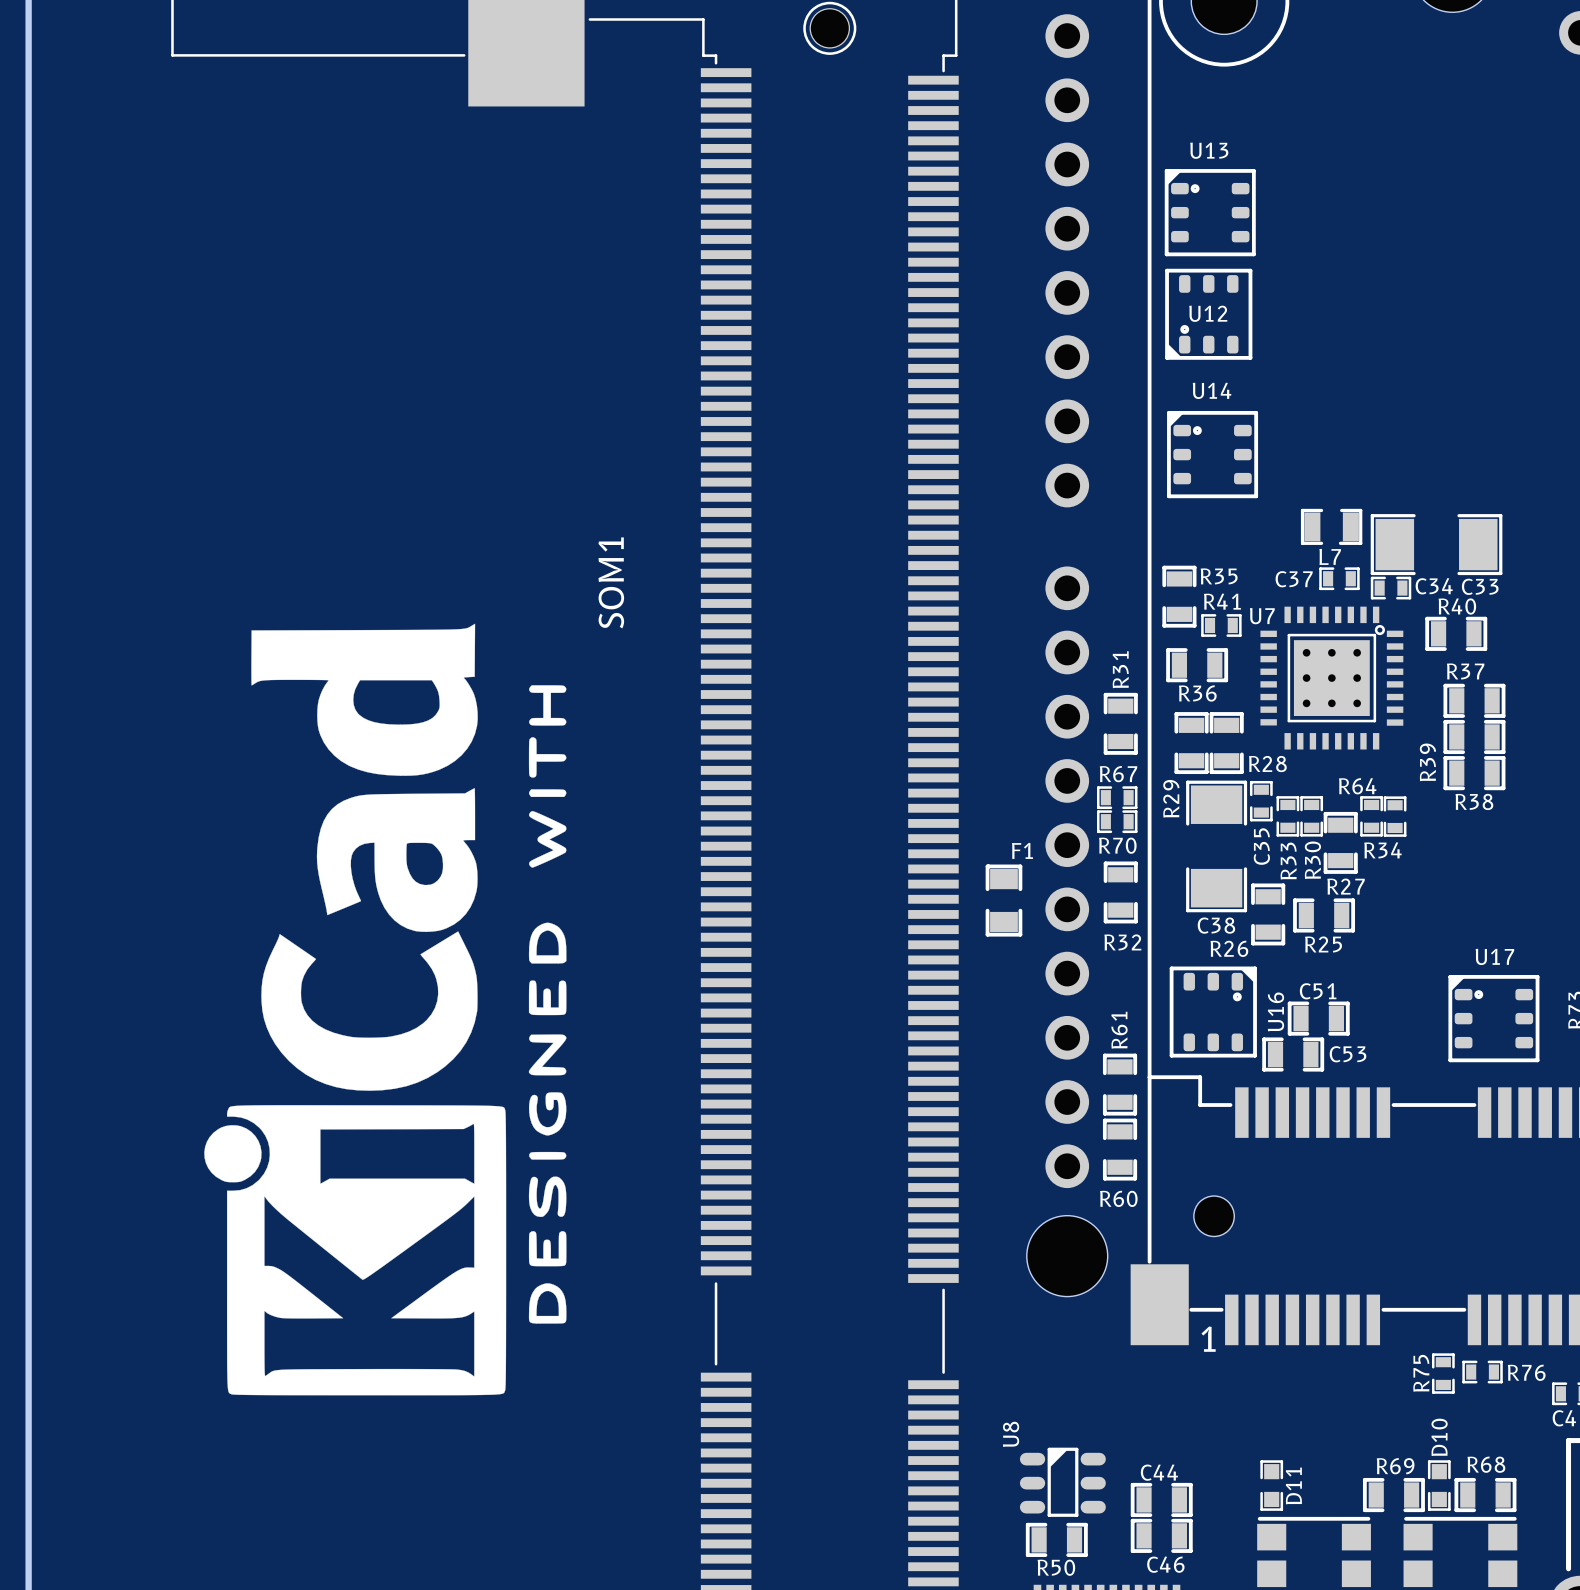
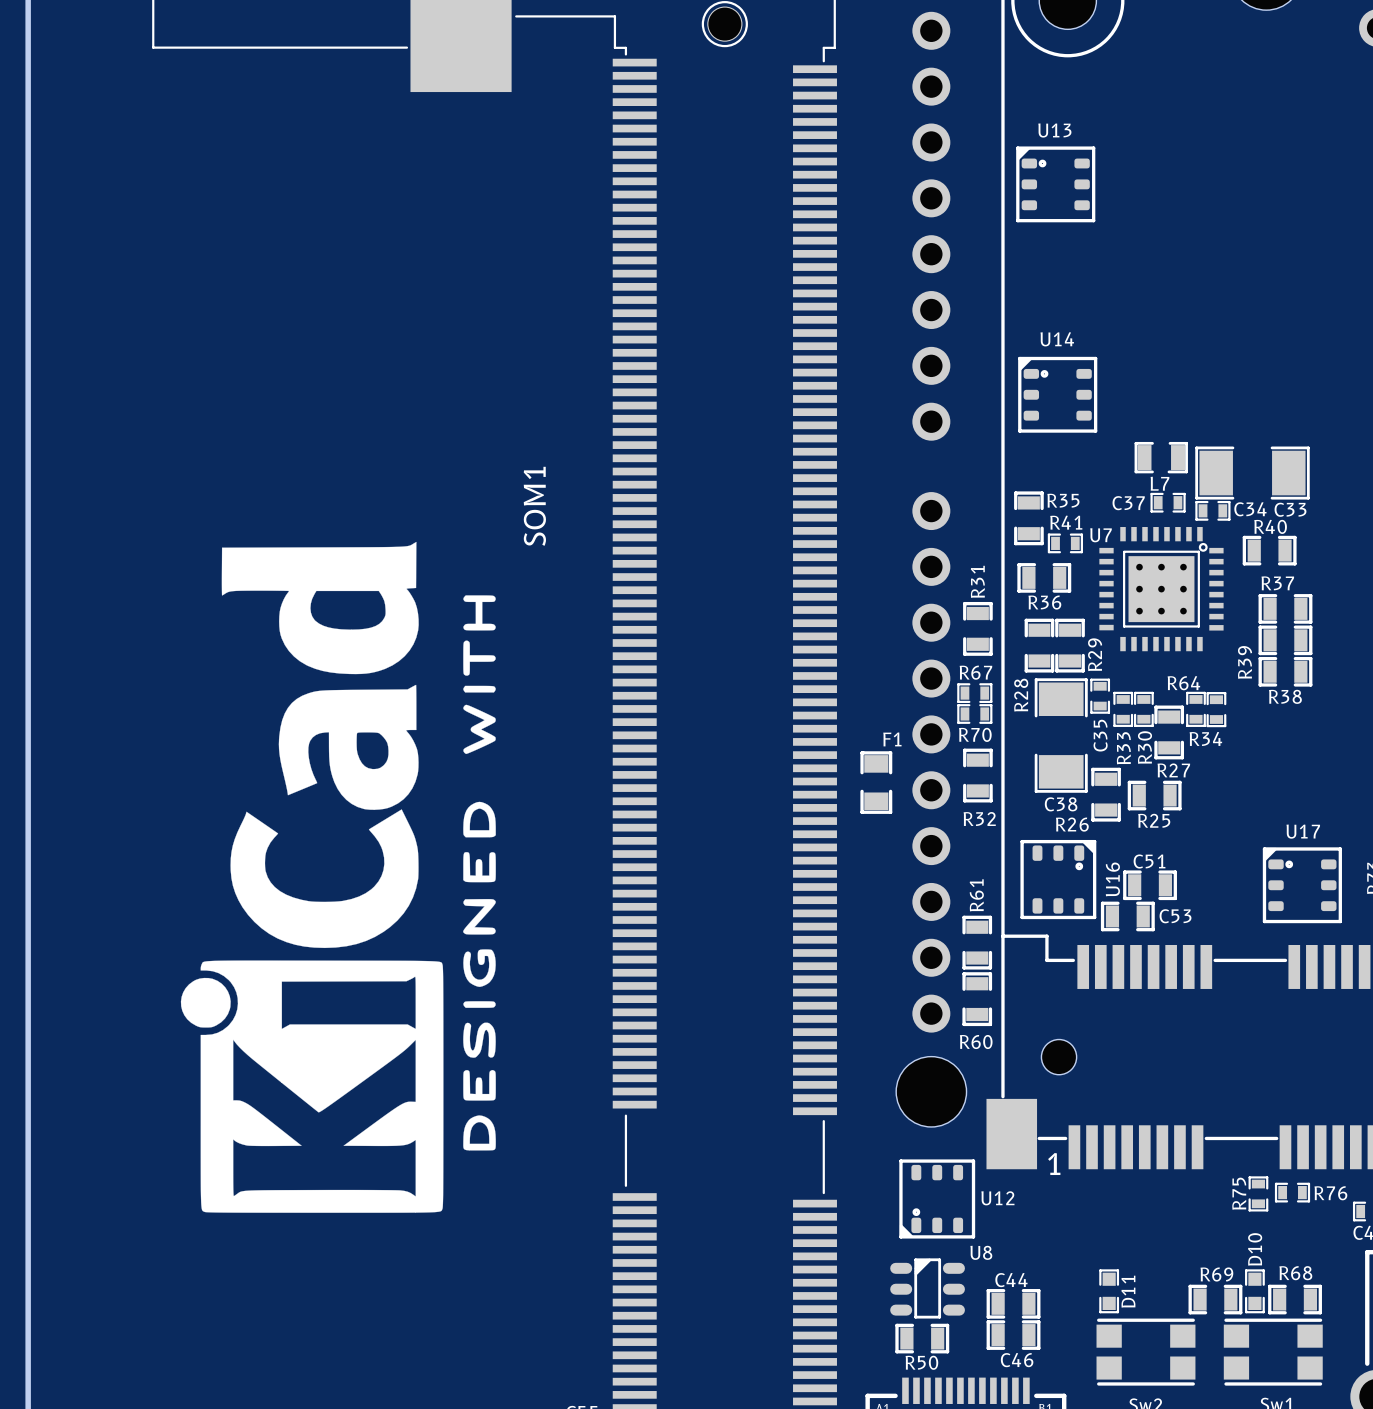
U12 name position: U12 (1208, 313) -> U12 (997, 1198)
U12 position: (1208, 314) -> (937, 1198)
R28 name: R28 (1267, 764) -> R29 (1095, 654)
R29 name: R29 (1171, 798) -> R28 (1021, 695)
U8 name rotation: 0° (1011, 1434) -> 90° clockwise (981, 1252)
U8 name position: U8 (1011, 1434) -> U8 (981, 1252)

